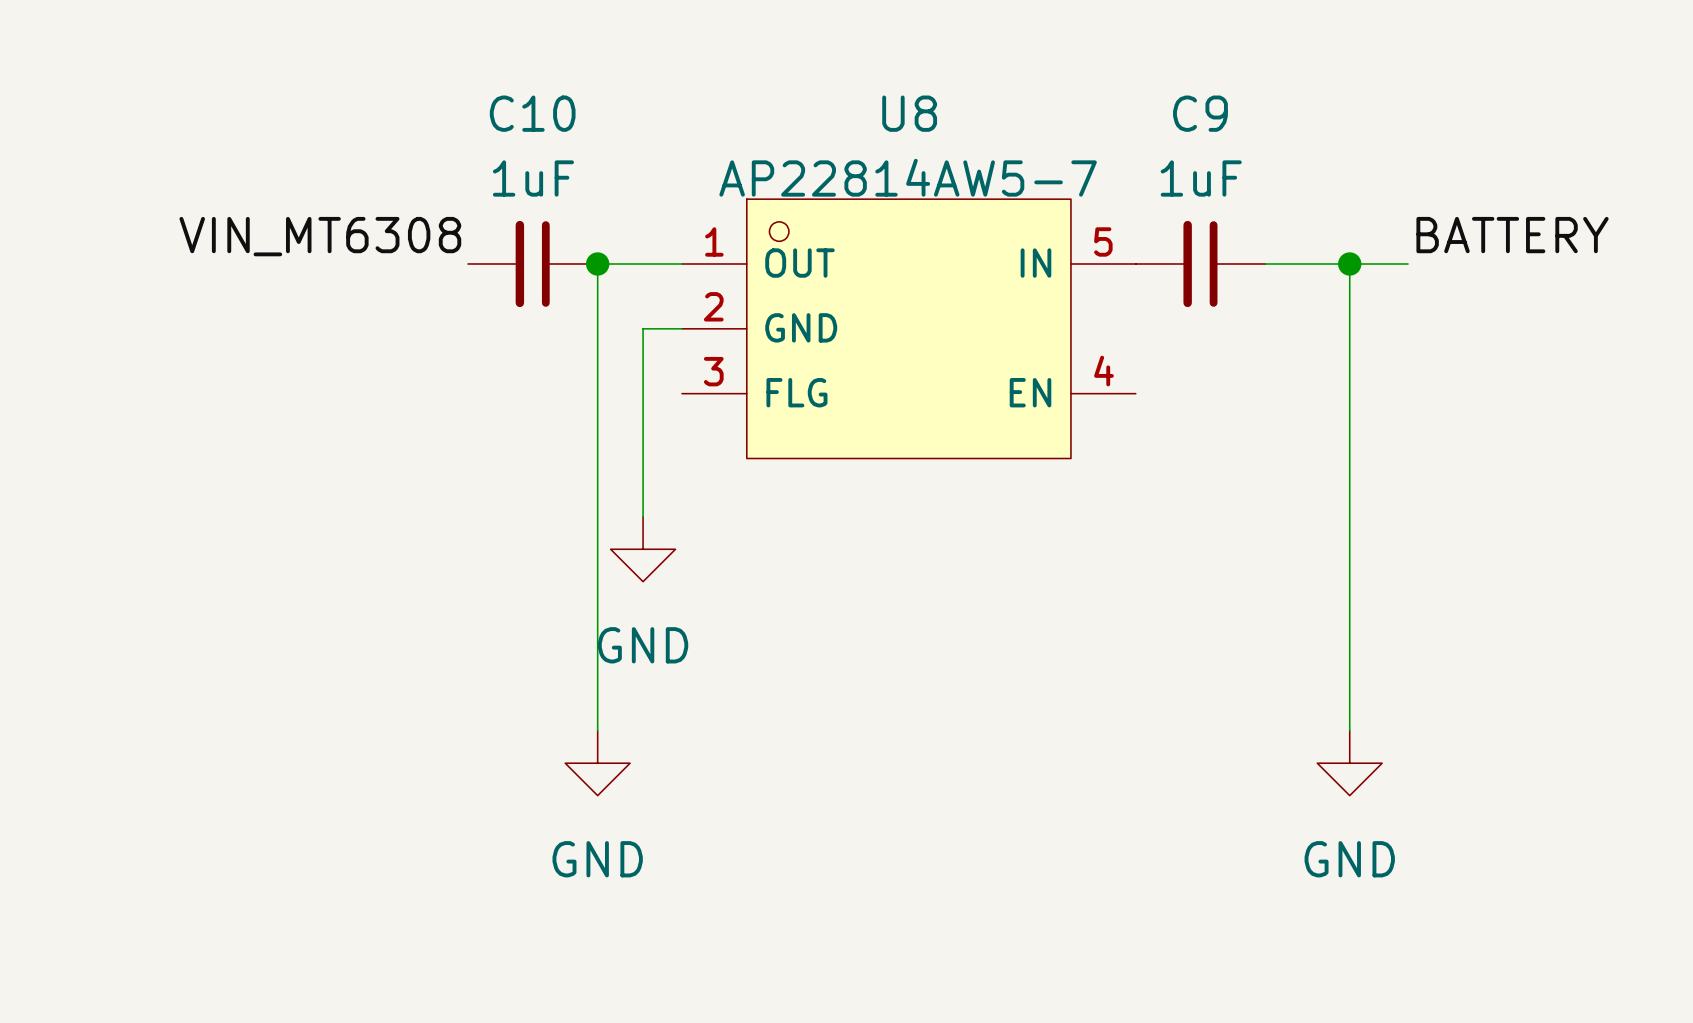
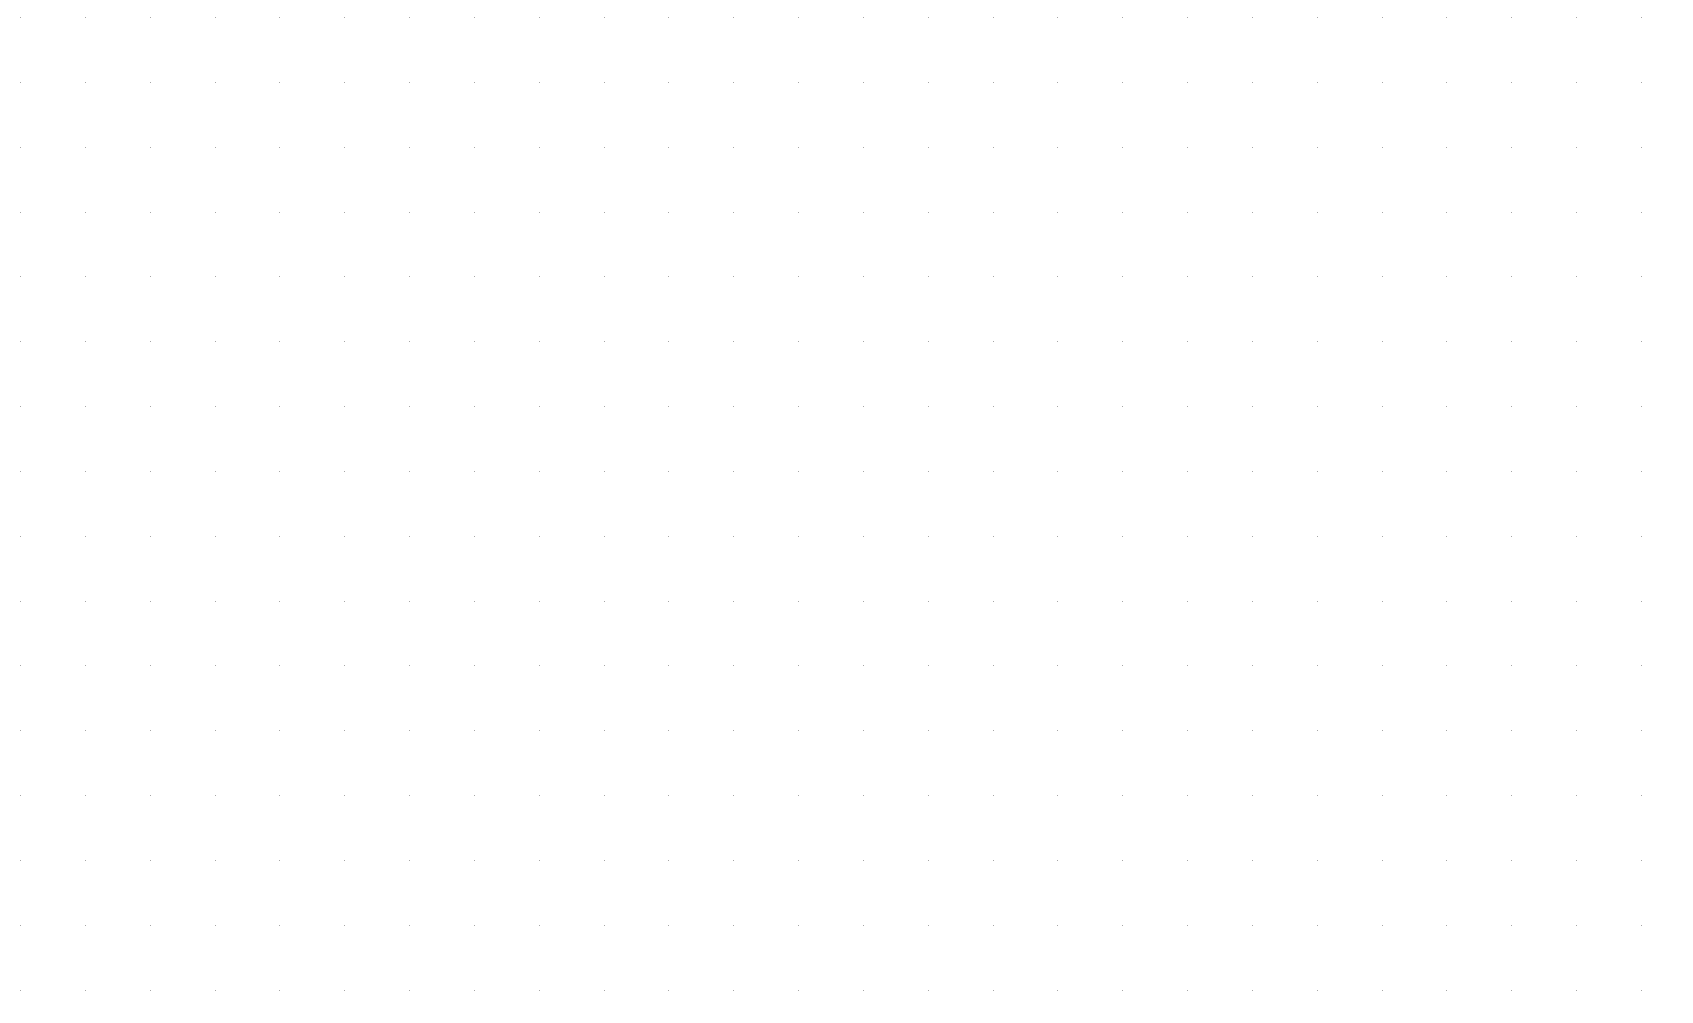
label: BATTERY (1512, 235) -> none
label: VIN_MT6308 (320, 236) -> none
C10: 1uF (532, 263) -> none
junction: (597, 263) -> none
wire: (681, 263) (597, 263) (597, 730) -> none
C9: 1uF (1200, 263) -> none
wire: (1265, 263) (1408, 263) -> none
wire: (1349, 263) (1349, 730) -> none
junction: (1349, 263) -> none
wire: (681, 328) (643, 328) (643, 516) -> none
U8: AP22814AW5-7 (908, 328) -> none
power symbol: GND (643, 549) -> none
power symbol: GND (597, 763) -> none
power symbol: GND (1349, 763) -> none

